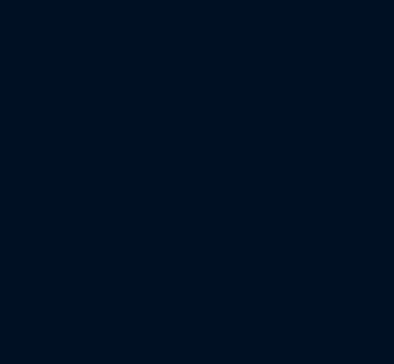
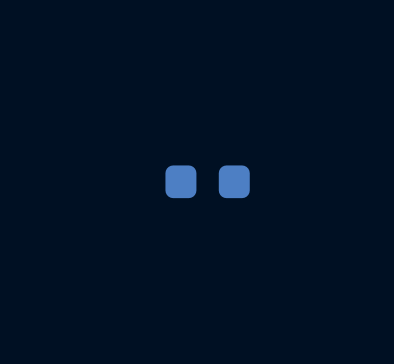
part: none -> (207, 181)

